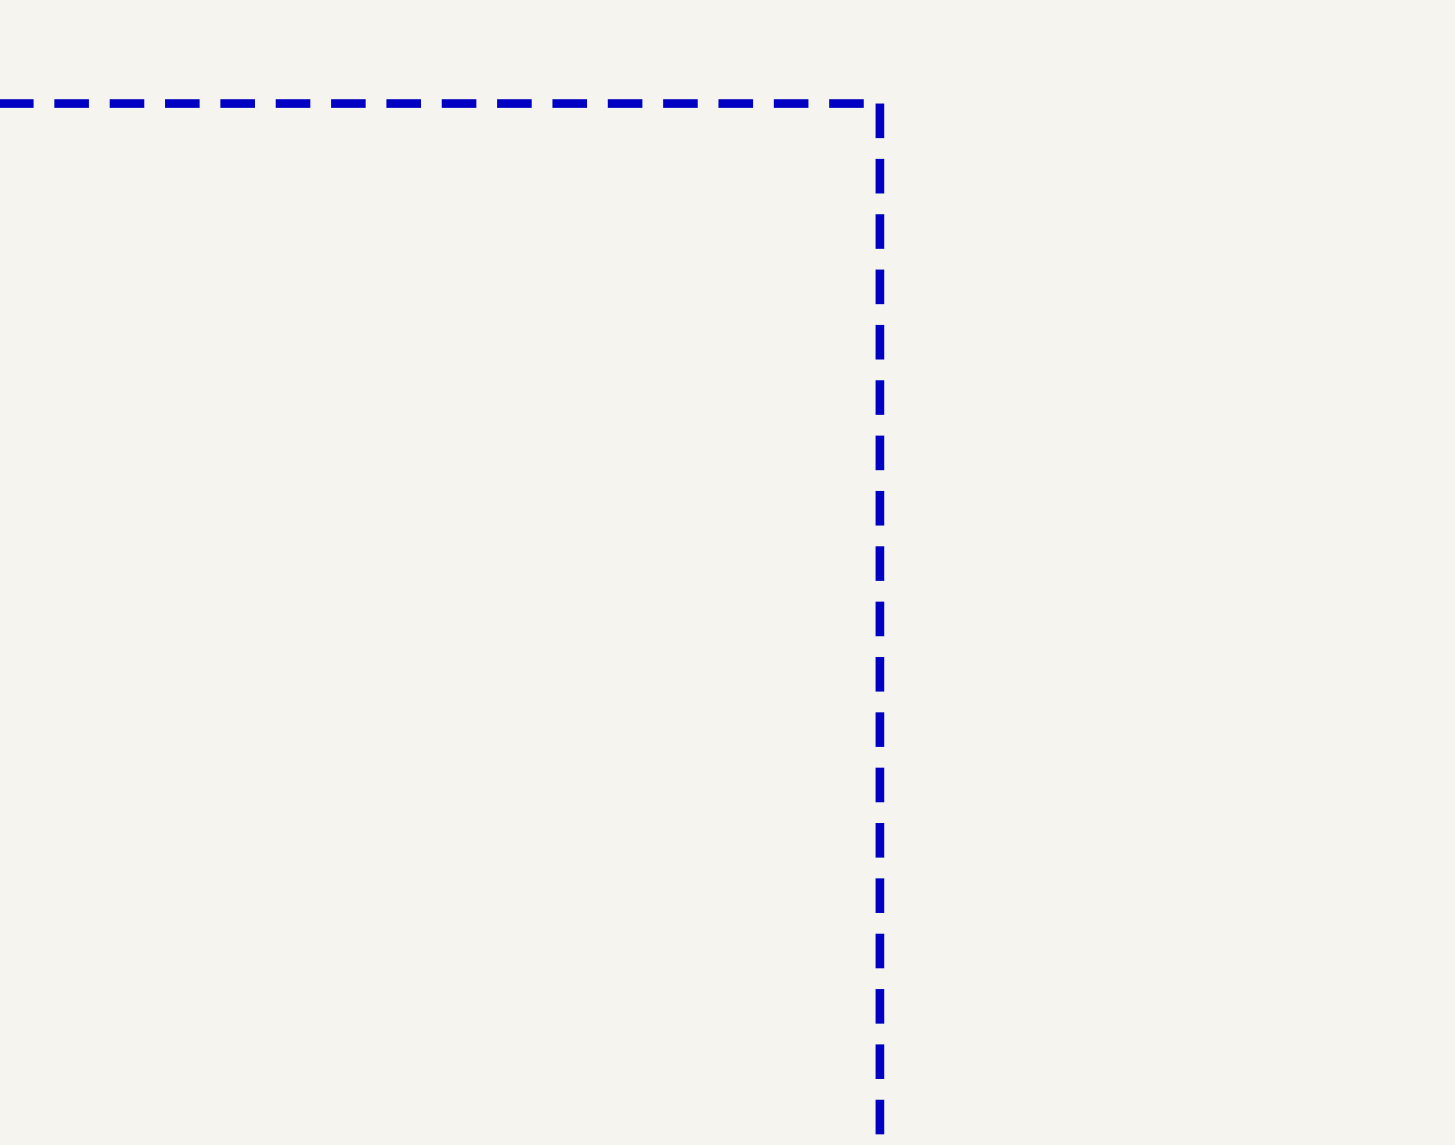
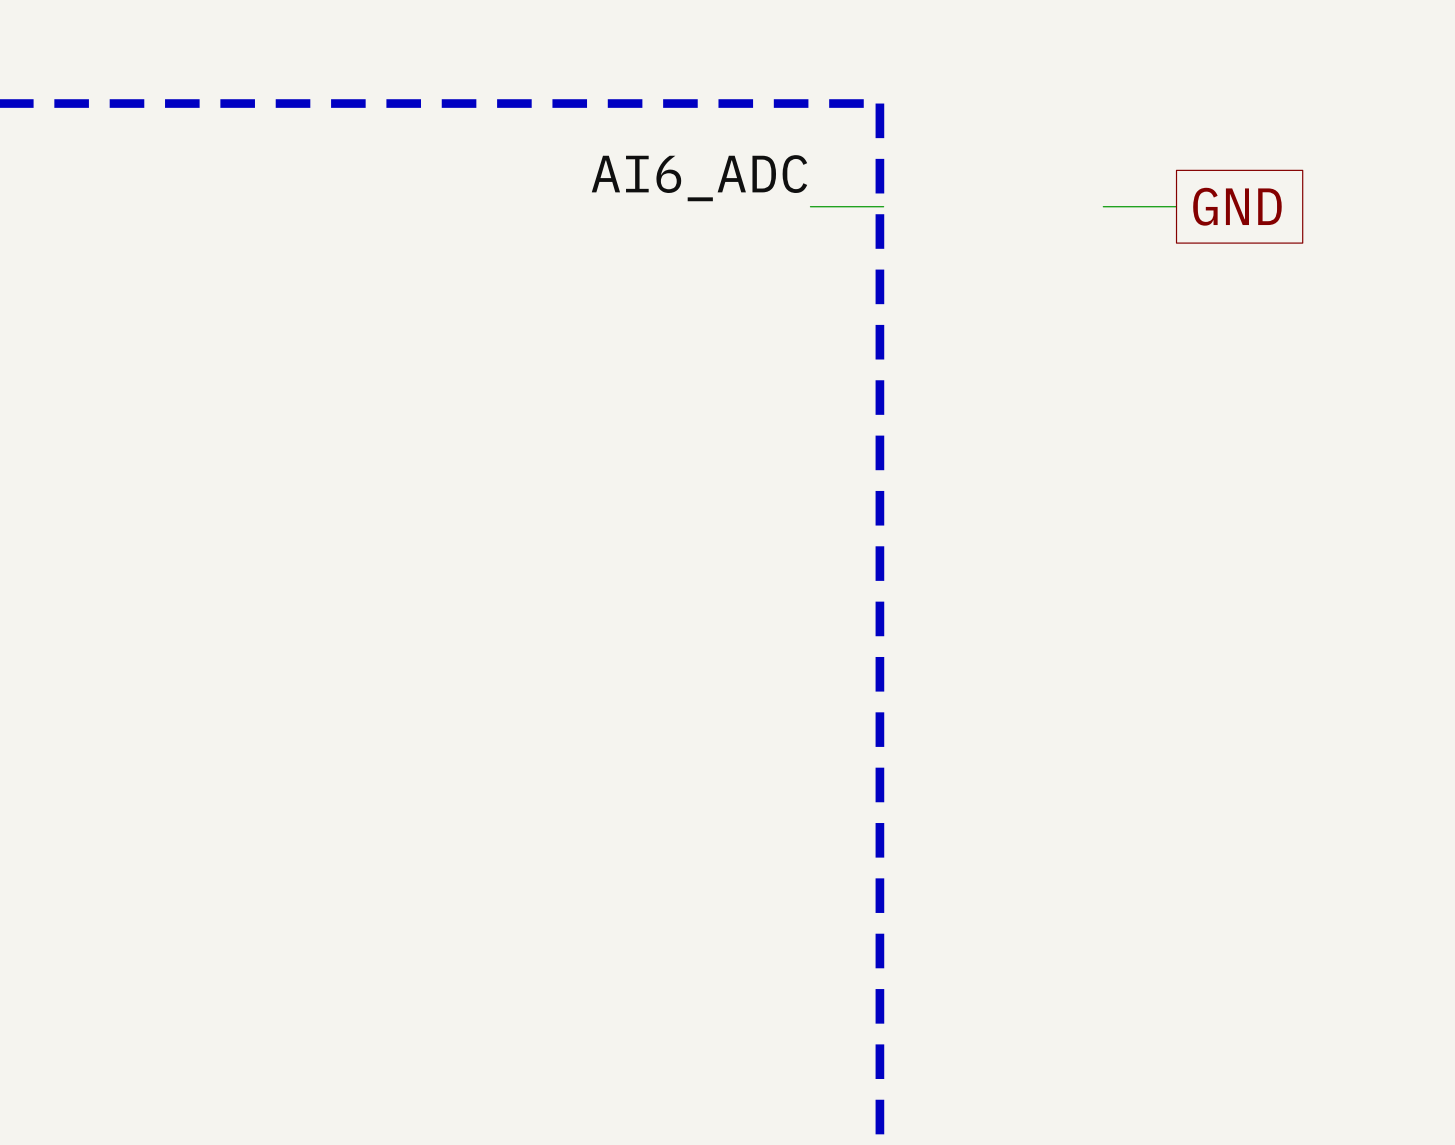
label: none -> AI6_ADC (699, 178)
wire: none -> (810, 206) (883, 206)
wire: none -> (1103, 206) (1176, 206)
global label: none -> GND (1237, 206)

